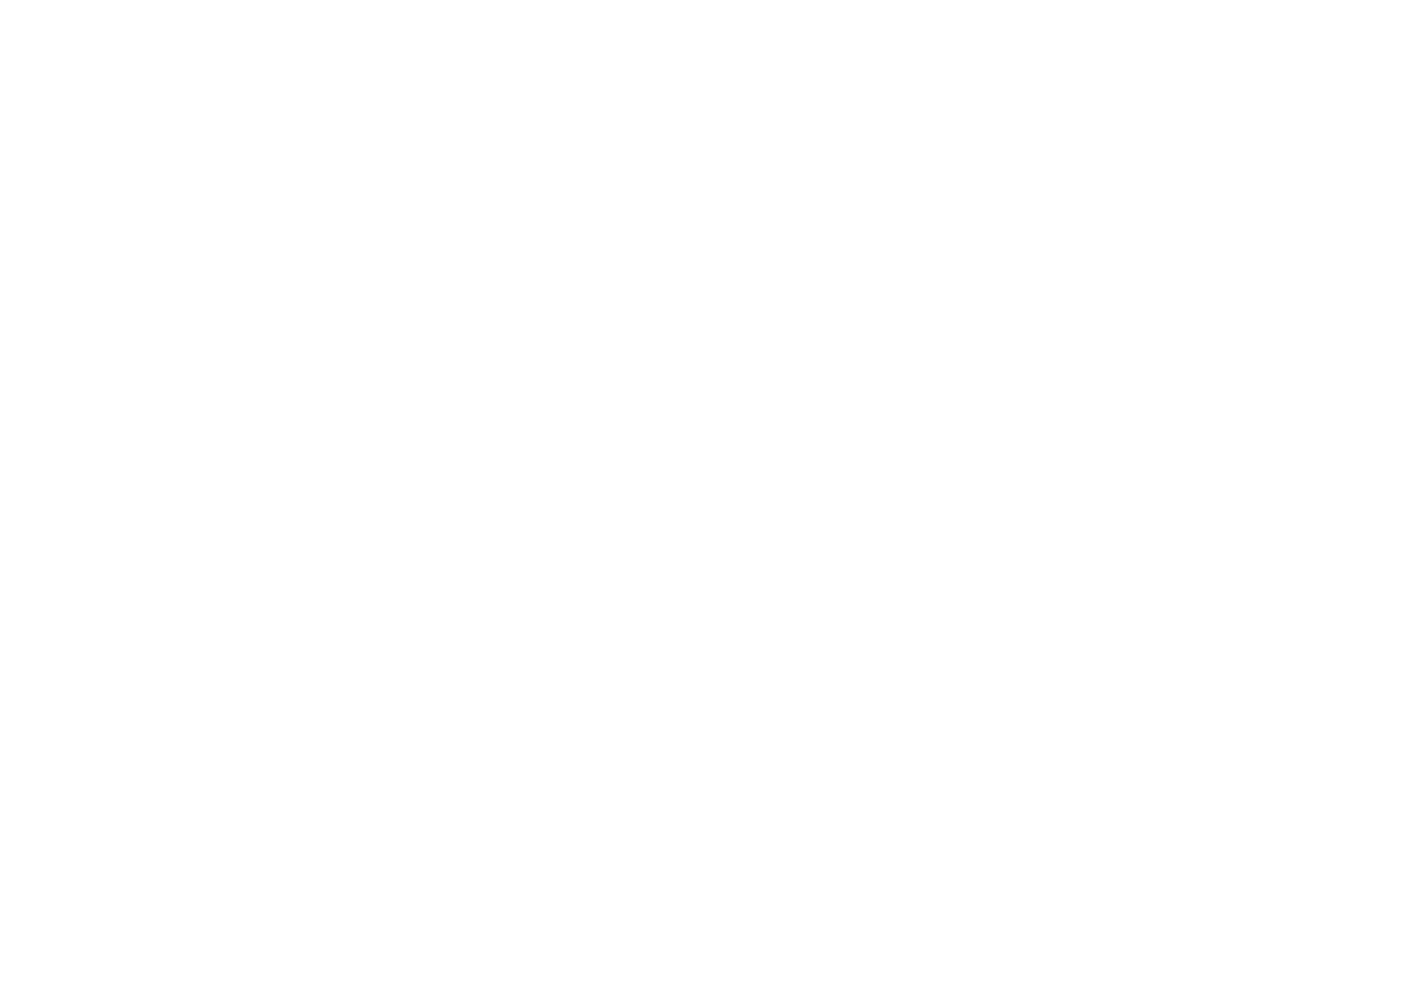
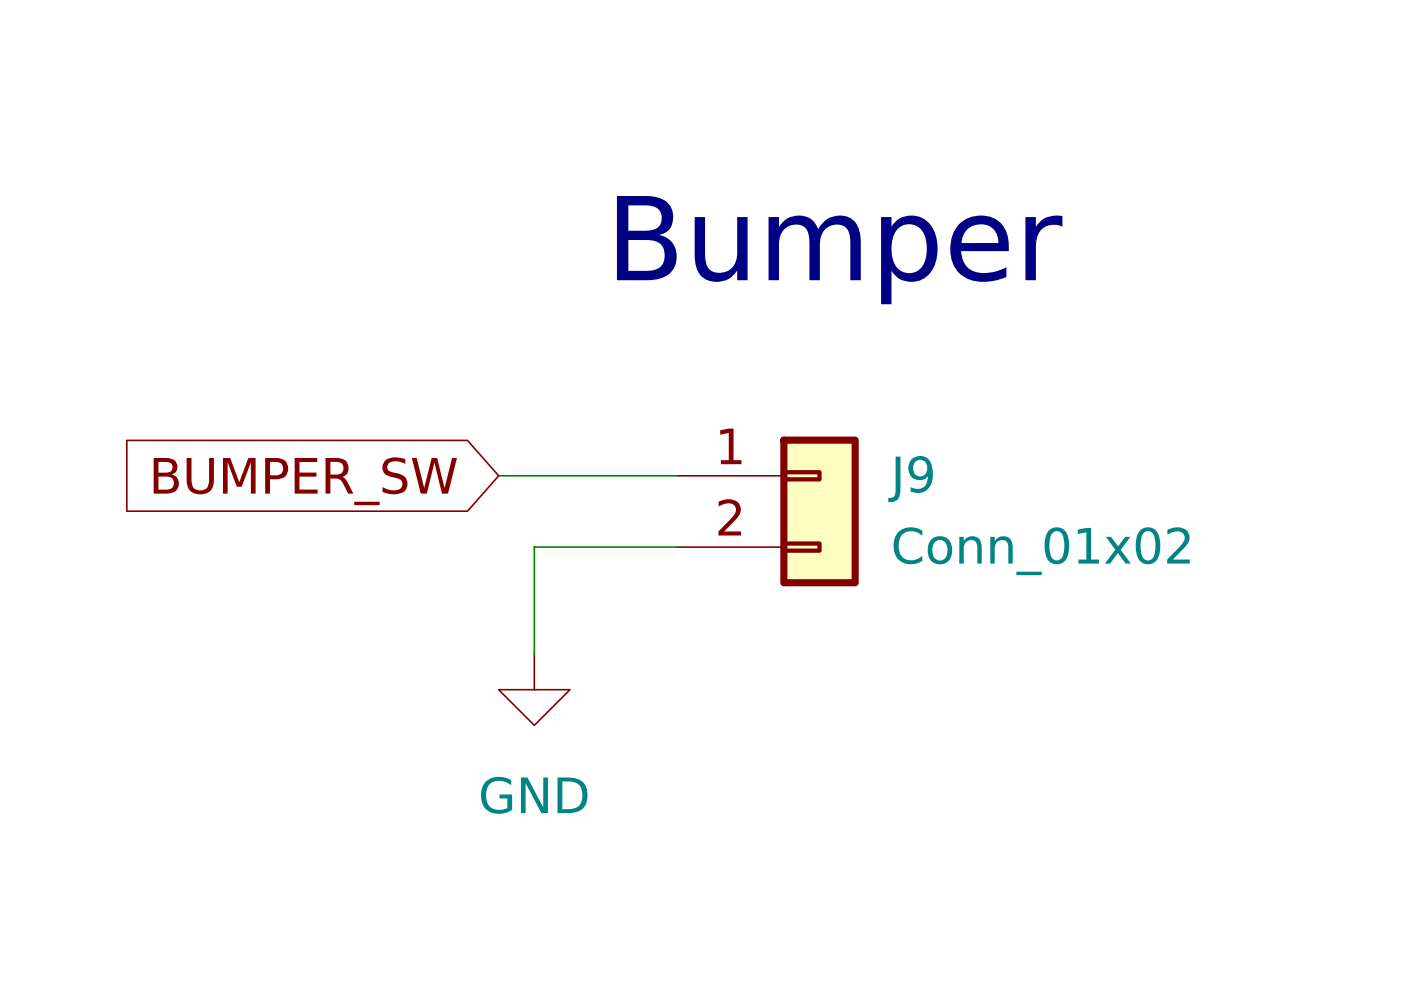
text: none -> Bumper (839, 250)
wire: none -> (498, 475) (676, 475)
global label: none -> BUMPER_SW (305, 481)
J9: none -> Conn_01x02 (767, 511)
wire: none -> (676, 547) (534, 547) (534, 654)
power symbol: none -> GND (534, 689)

